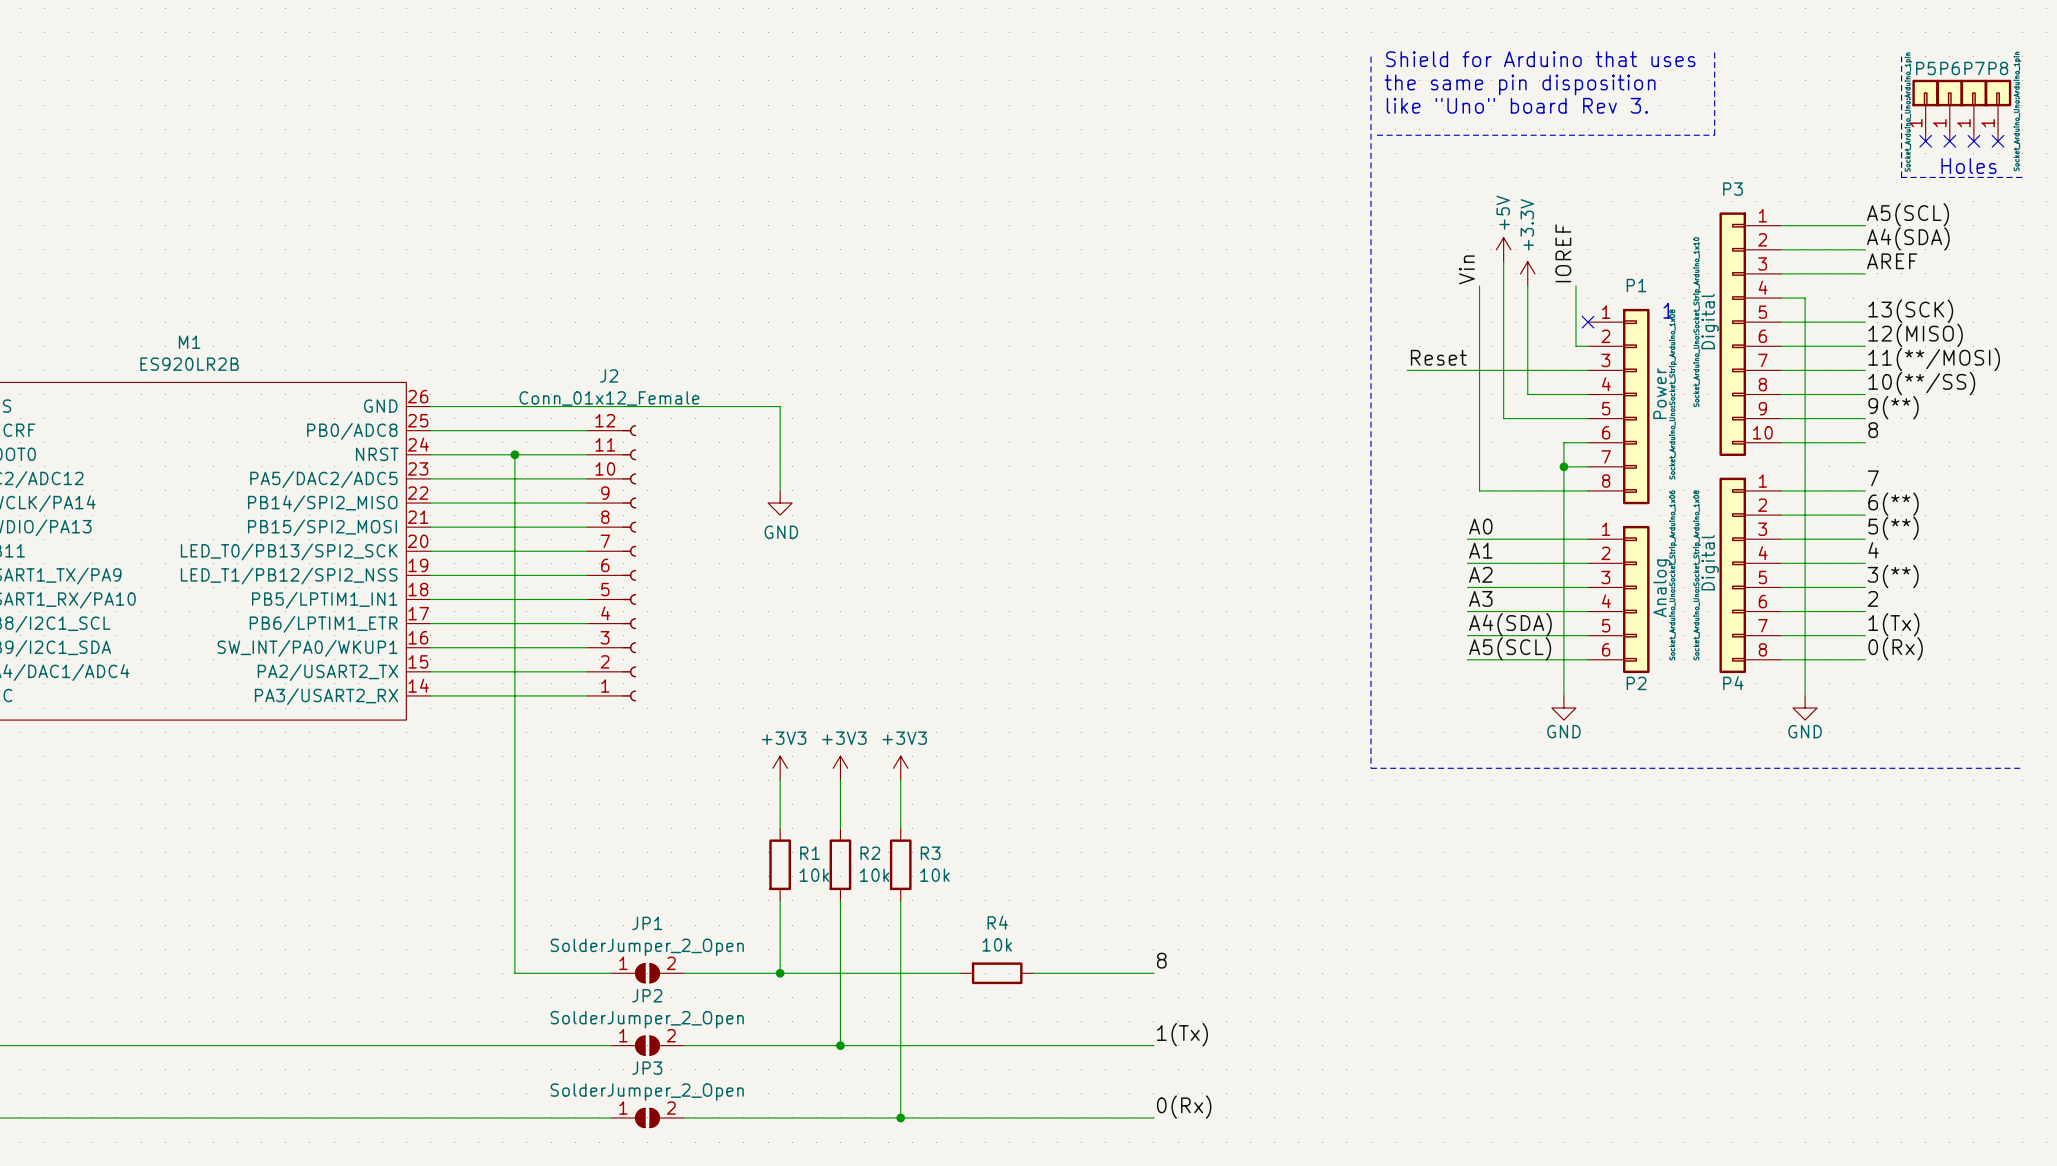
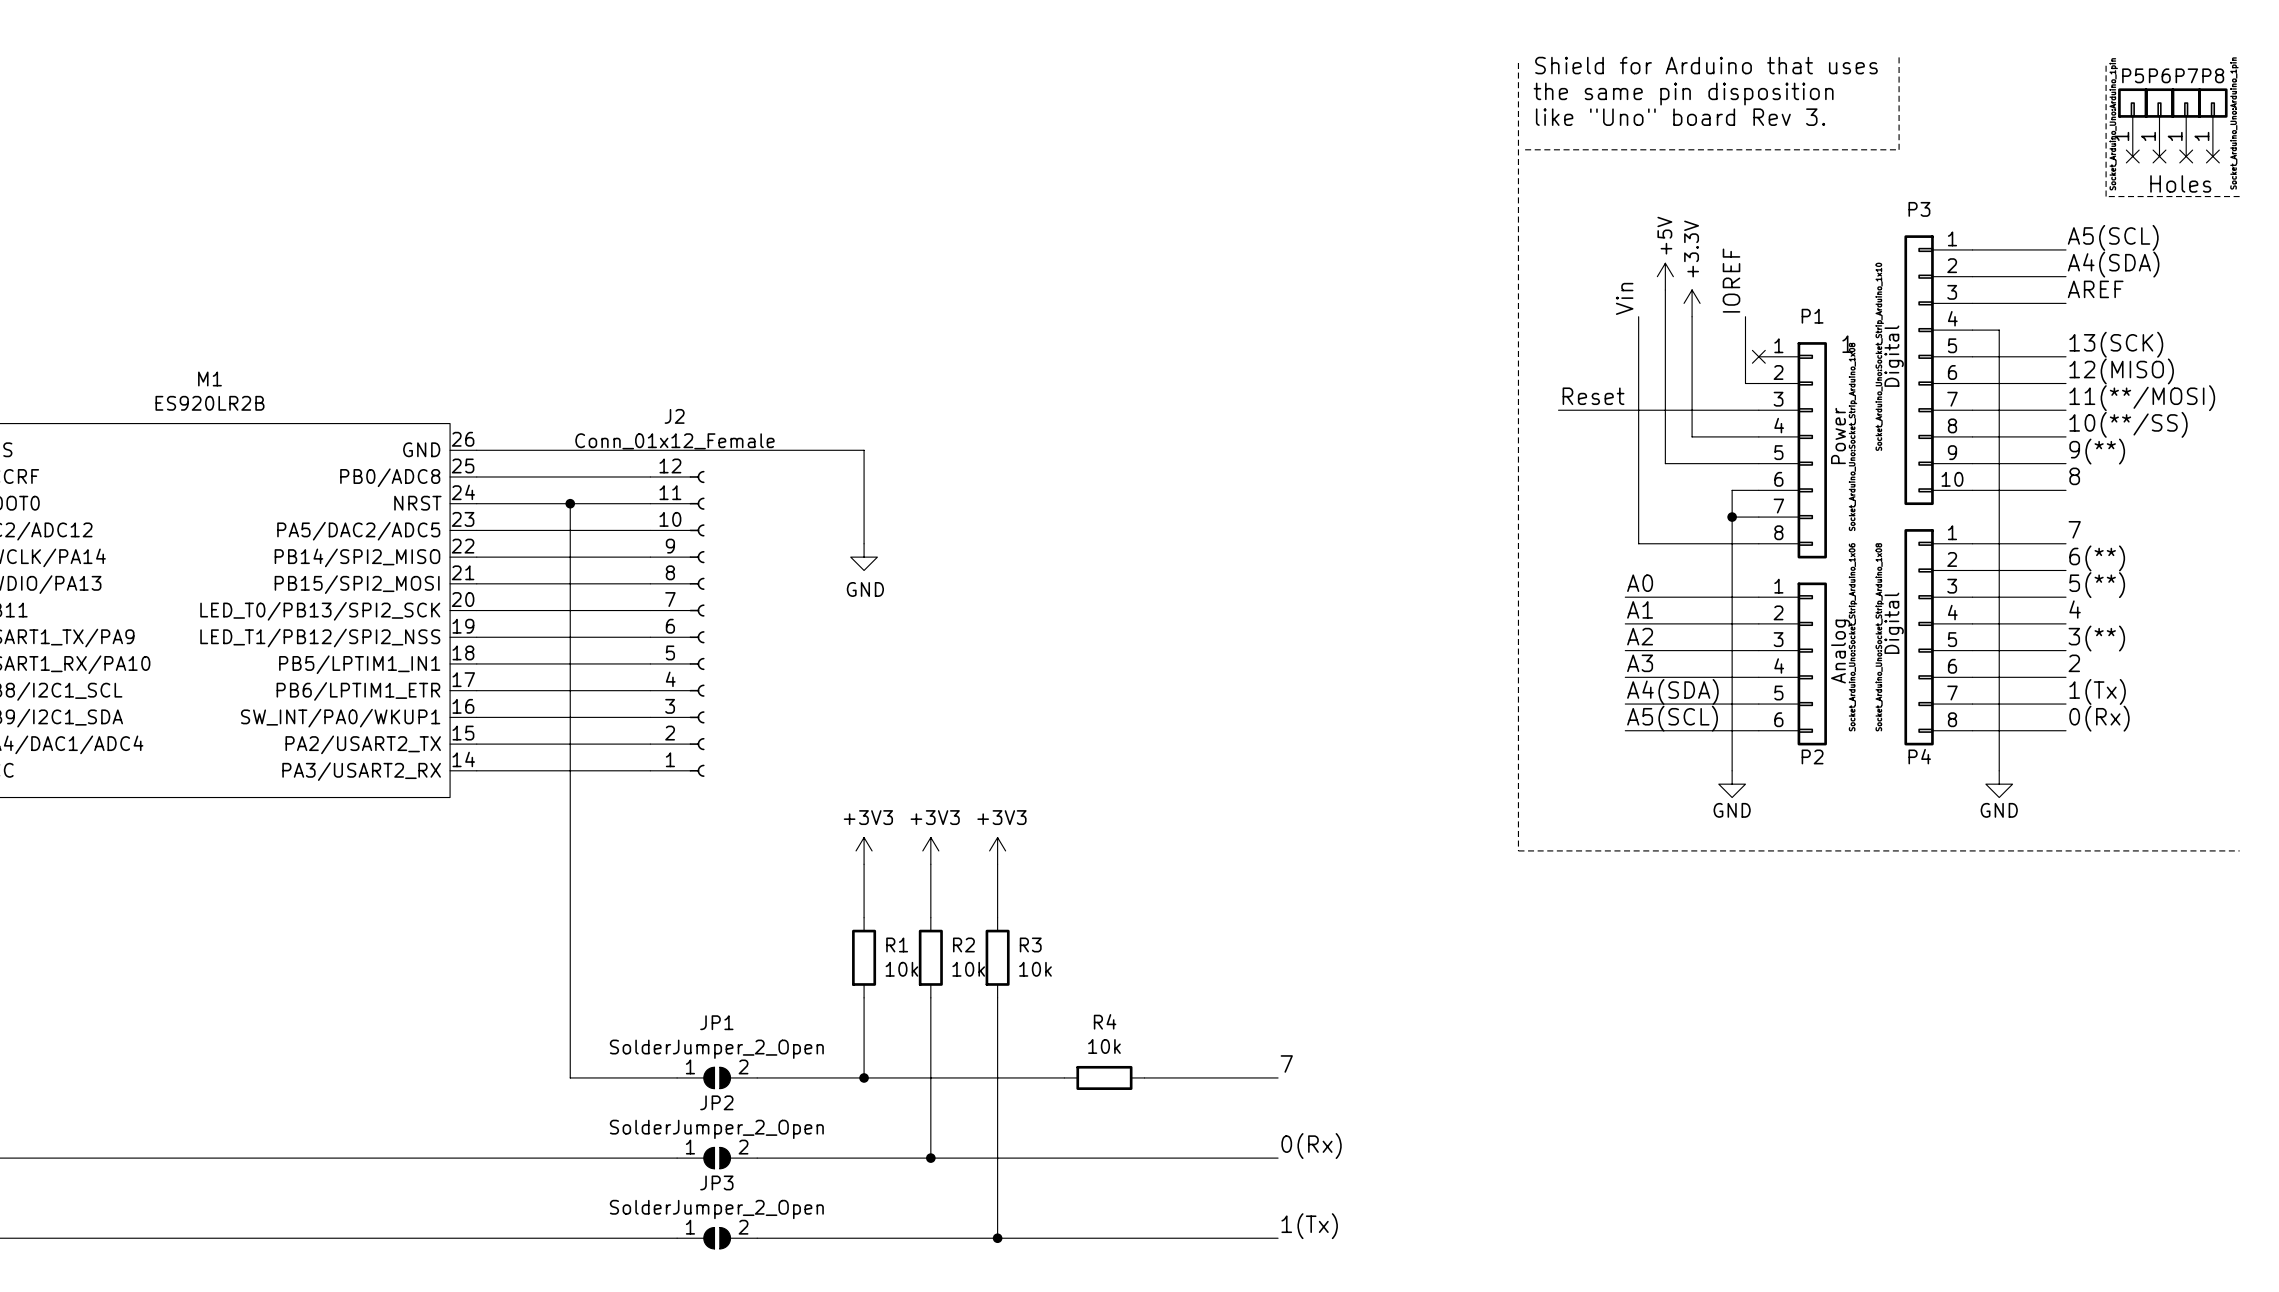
label: 8 (1161, 960) -> 7 (1286, 1063)
label: 1(Tx) (1182, 1034) -> 0(Rx) (1311, 1146)
label: 0(Rx) (1184, 1107) -> 1(Tx) (1309, 1226)

